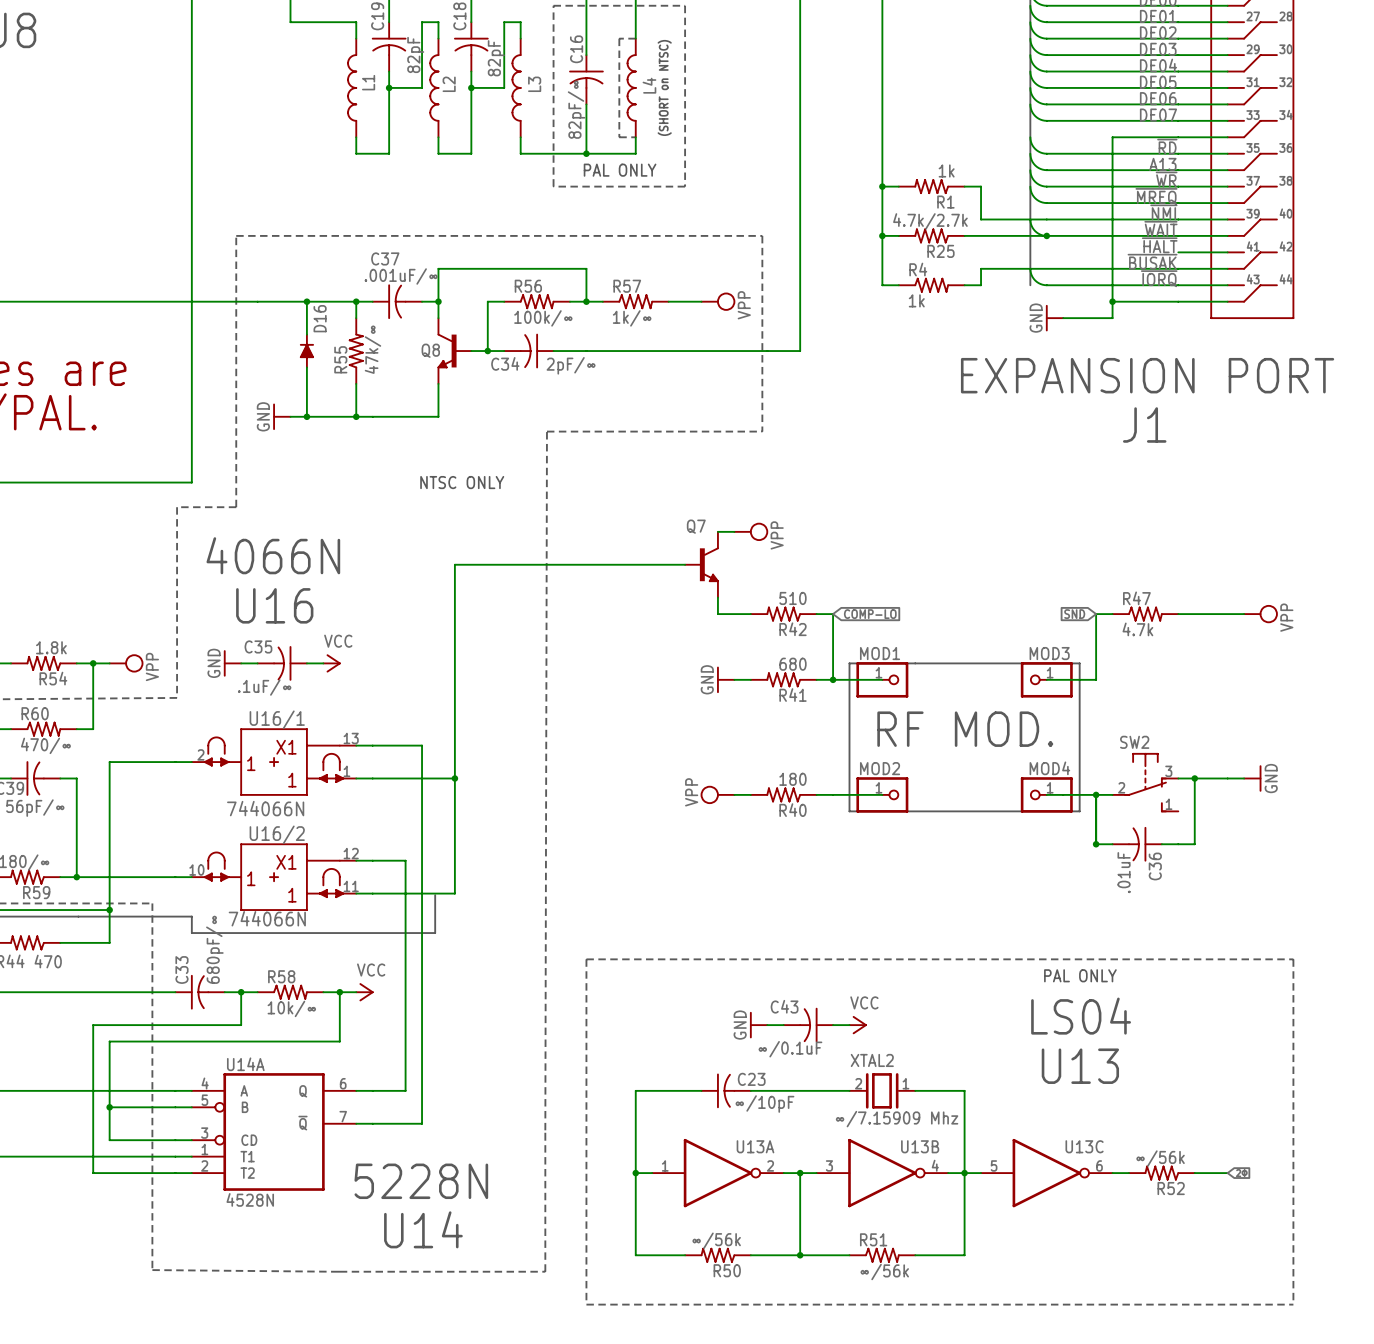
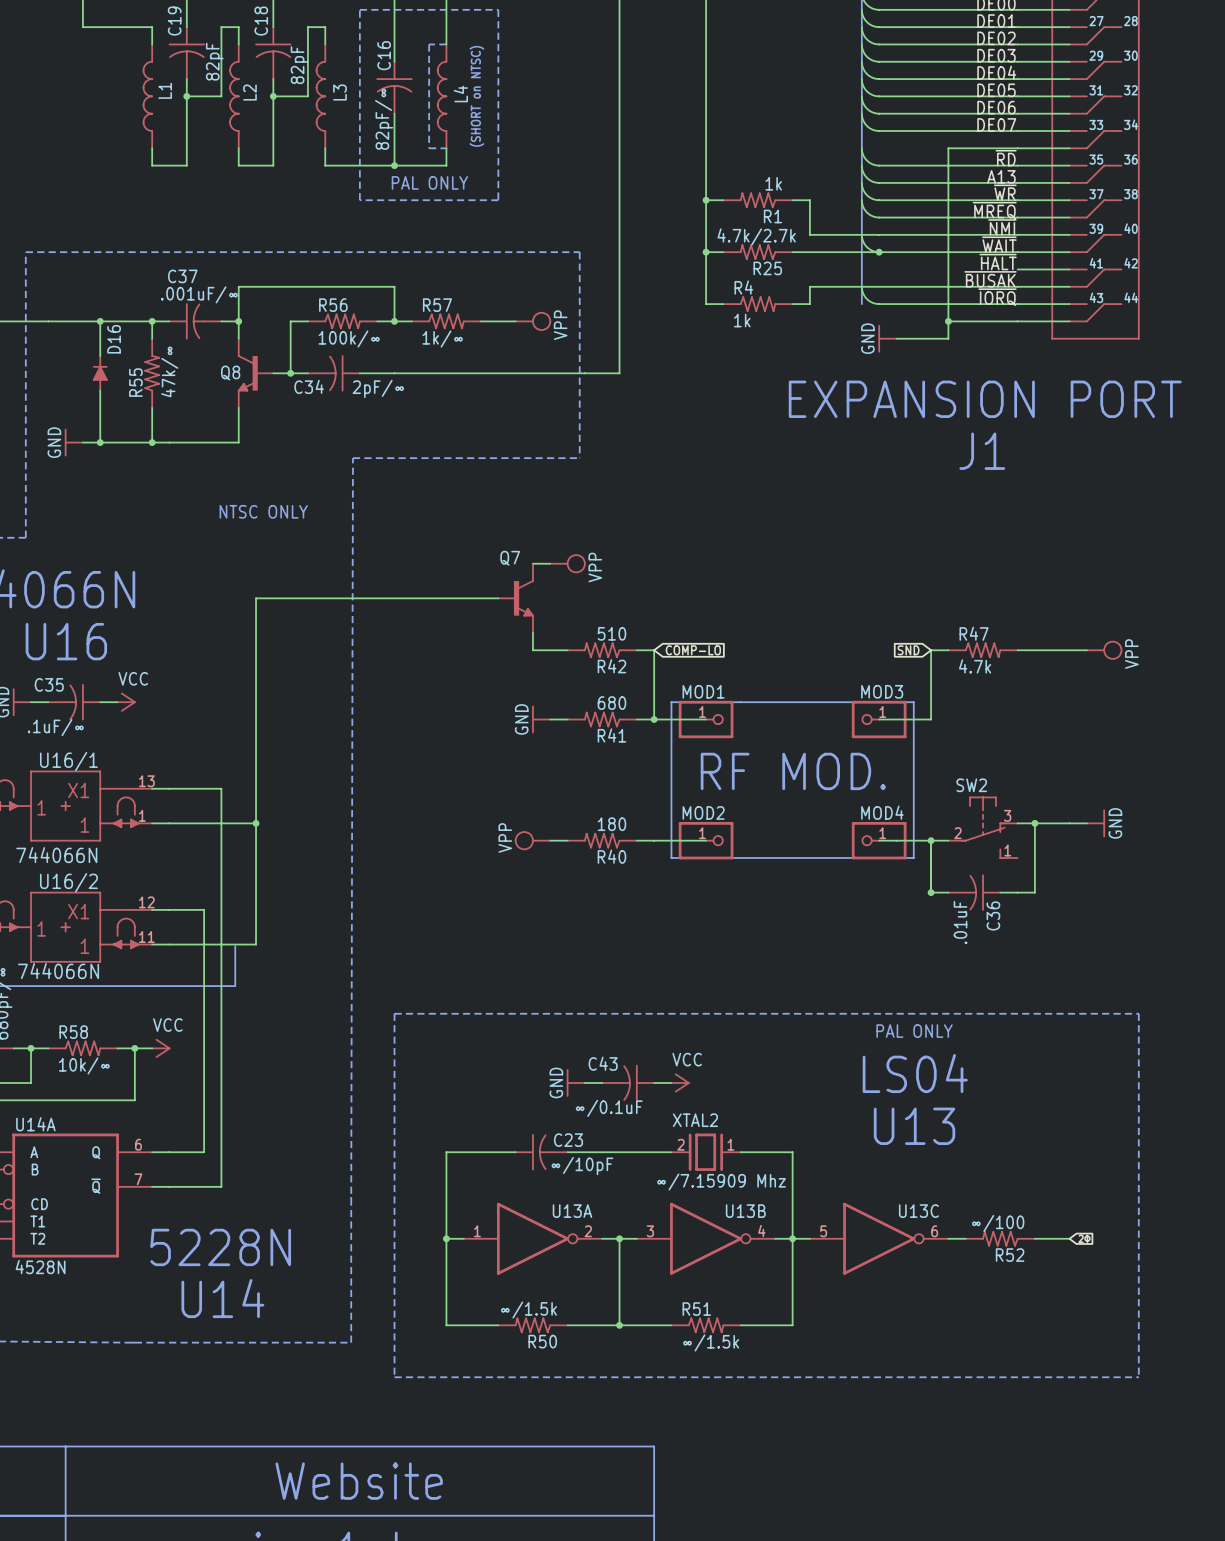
R52 value: ∞/56k (1160, 1158) -> ∞/100 (998, 1223)
R50 value: ∞/56k (716, 1240) -> ∞/1.5k (528, 1310)
R51 value: ∞/56k (884, 1272) -> ∞/1.5k (711, 1342)

